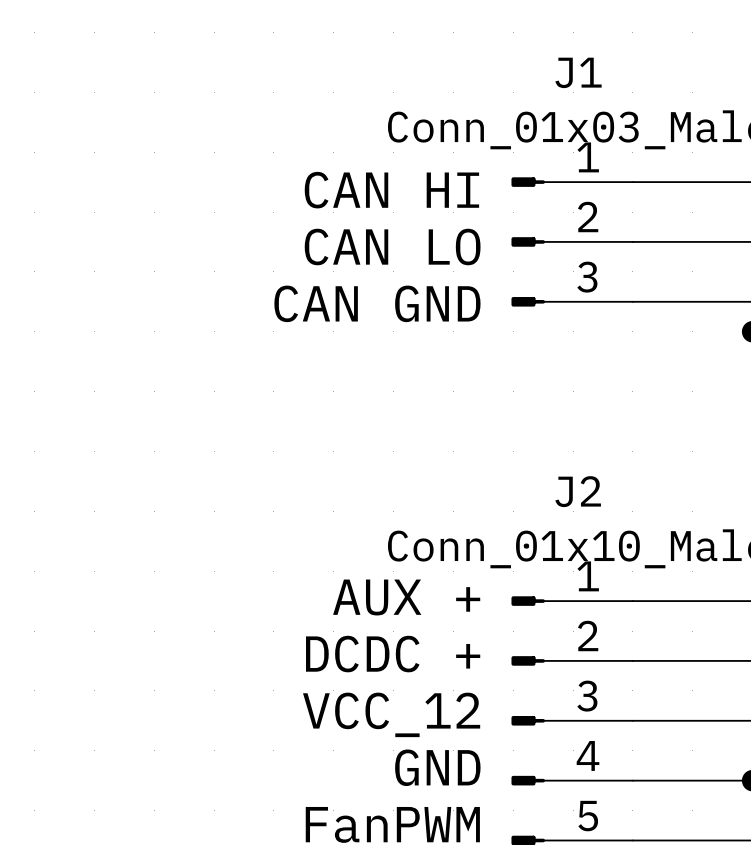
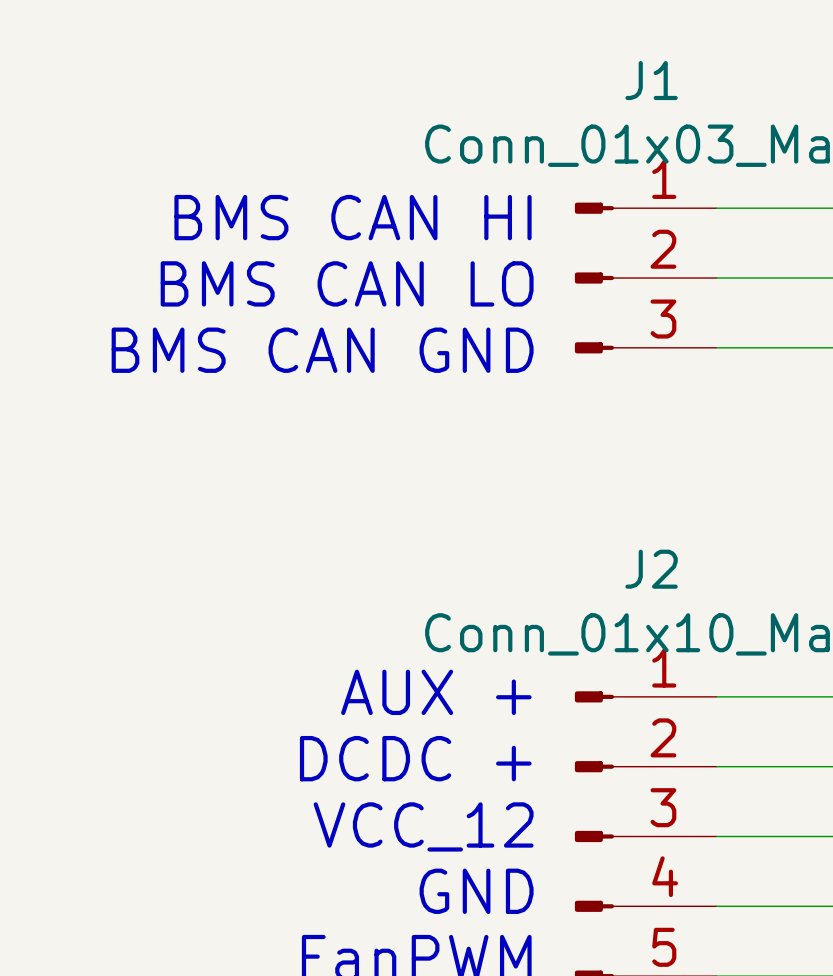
text: CAN HI (391, 190) -> BMS CAN HI (353, 217)
text: CAN LO (392, 247) -> BMS CAN LO (347, 283)
text: CAN GND (377, 303) -> BMS CAN GND (322, 350)

